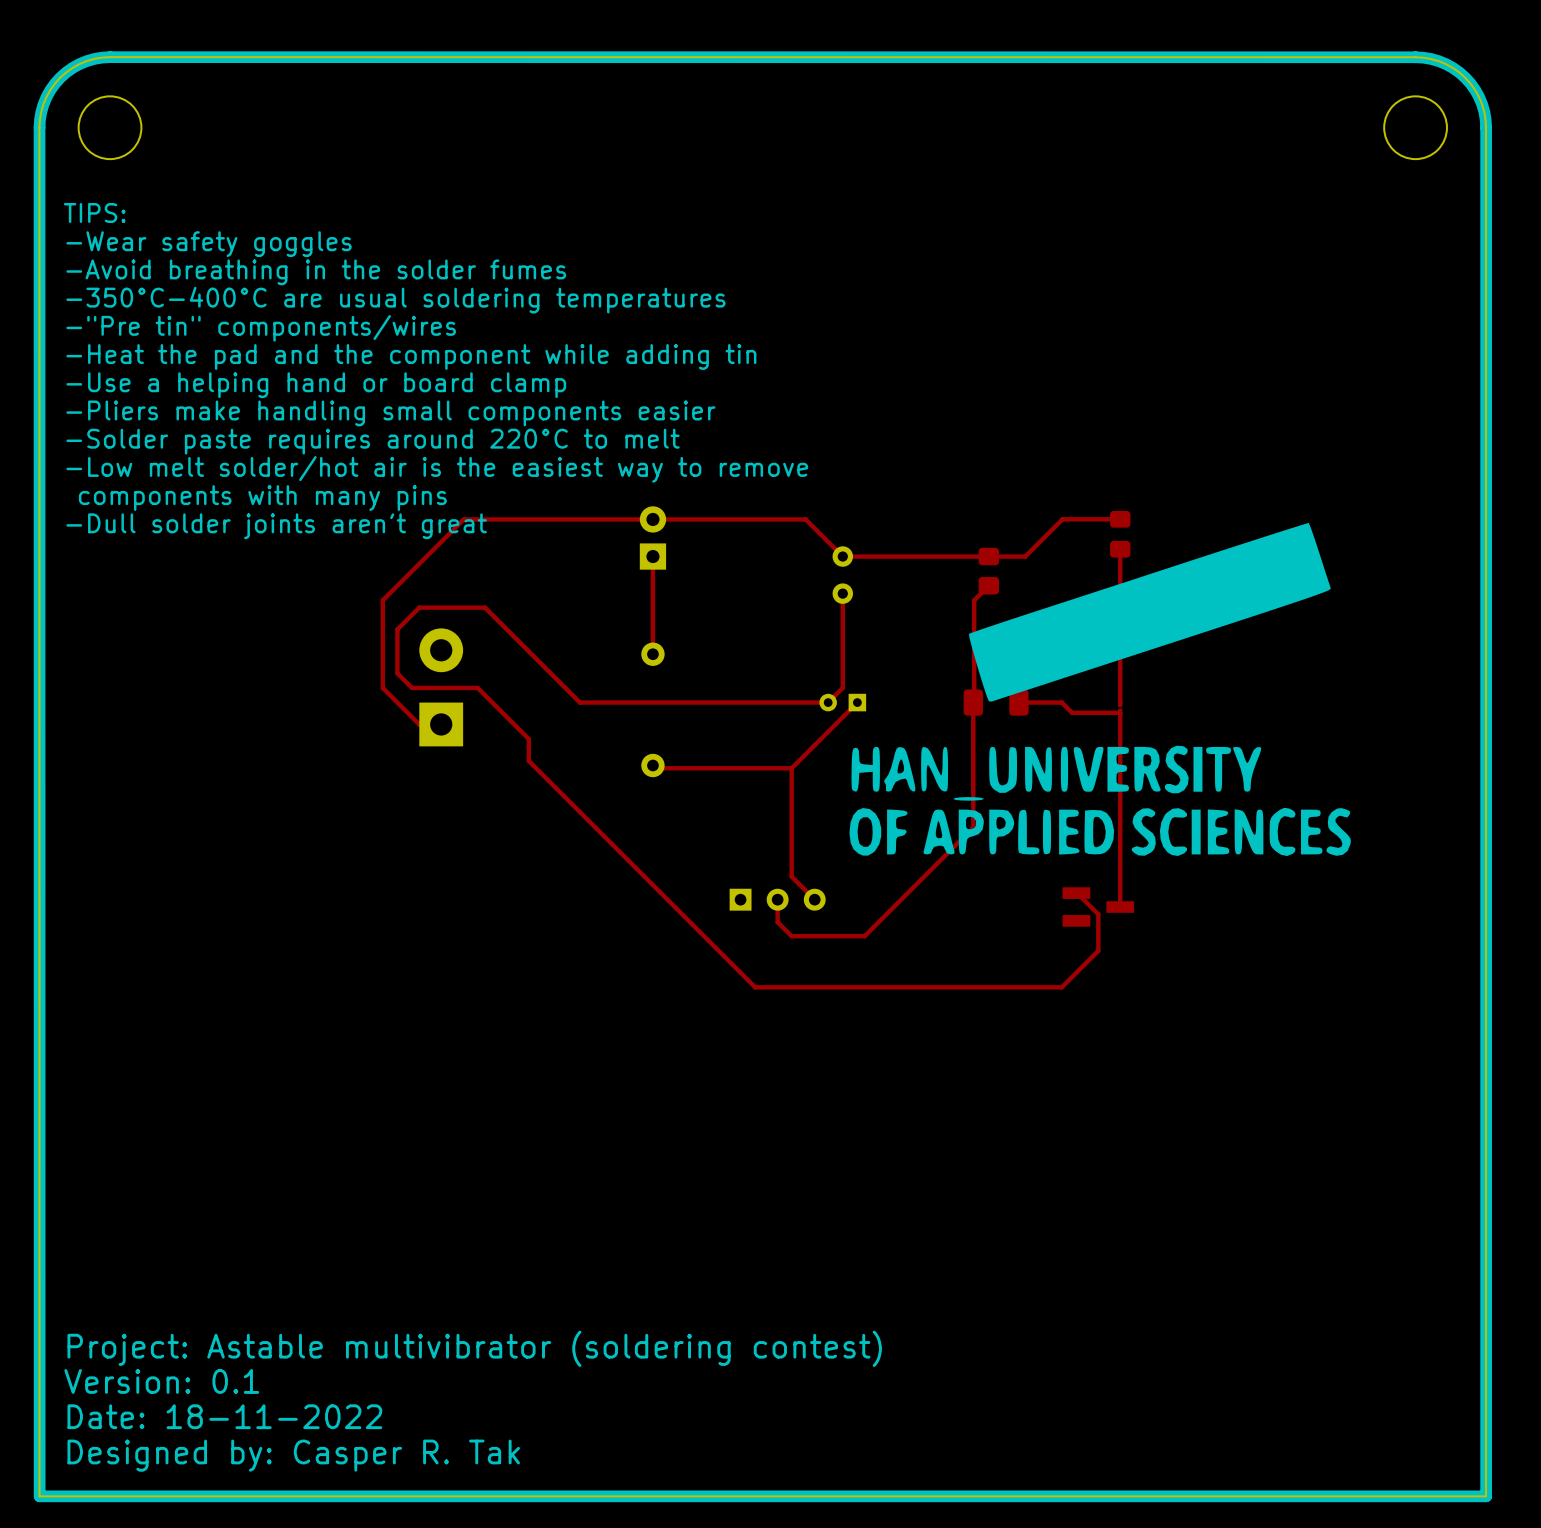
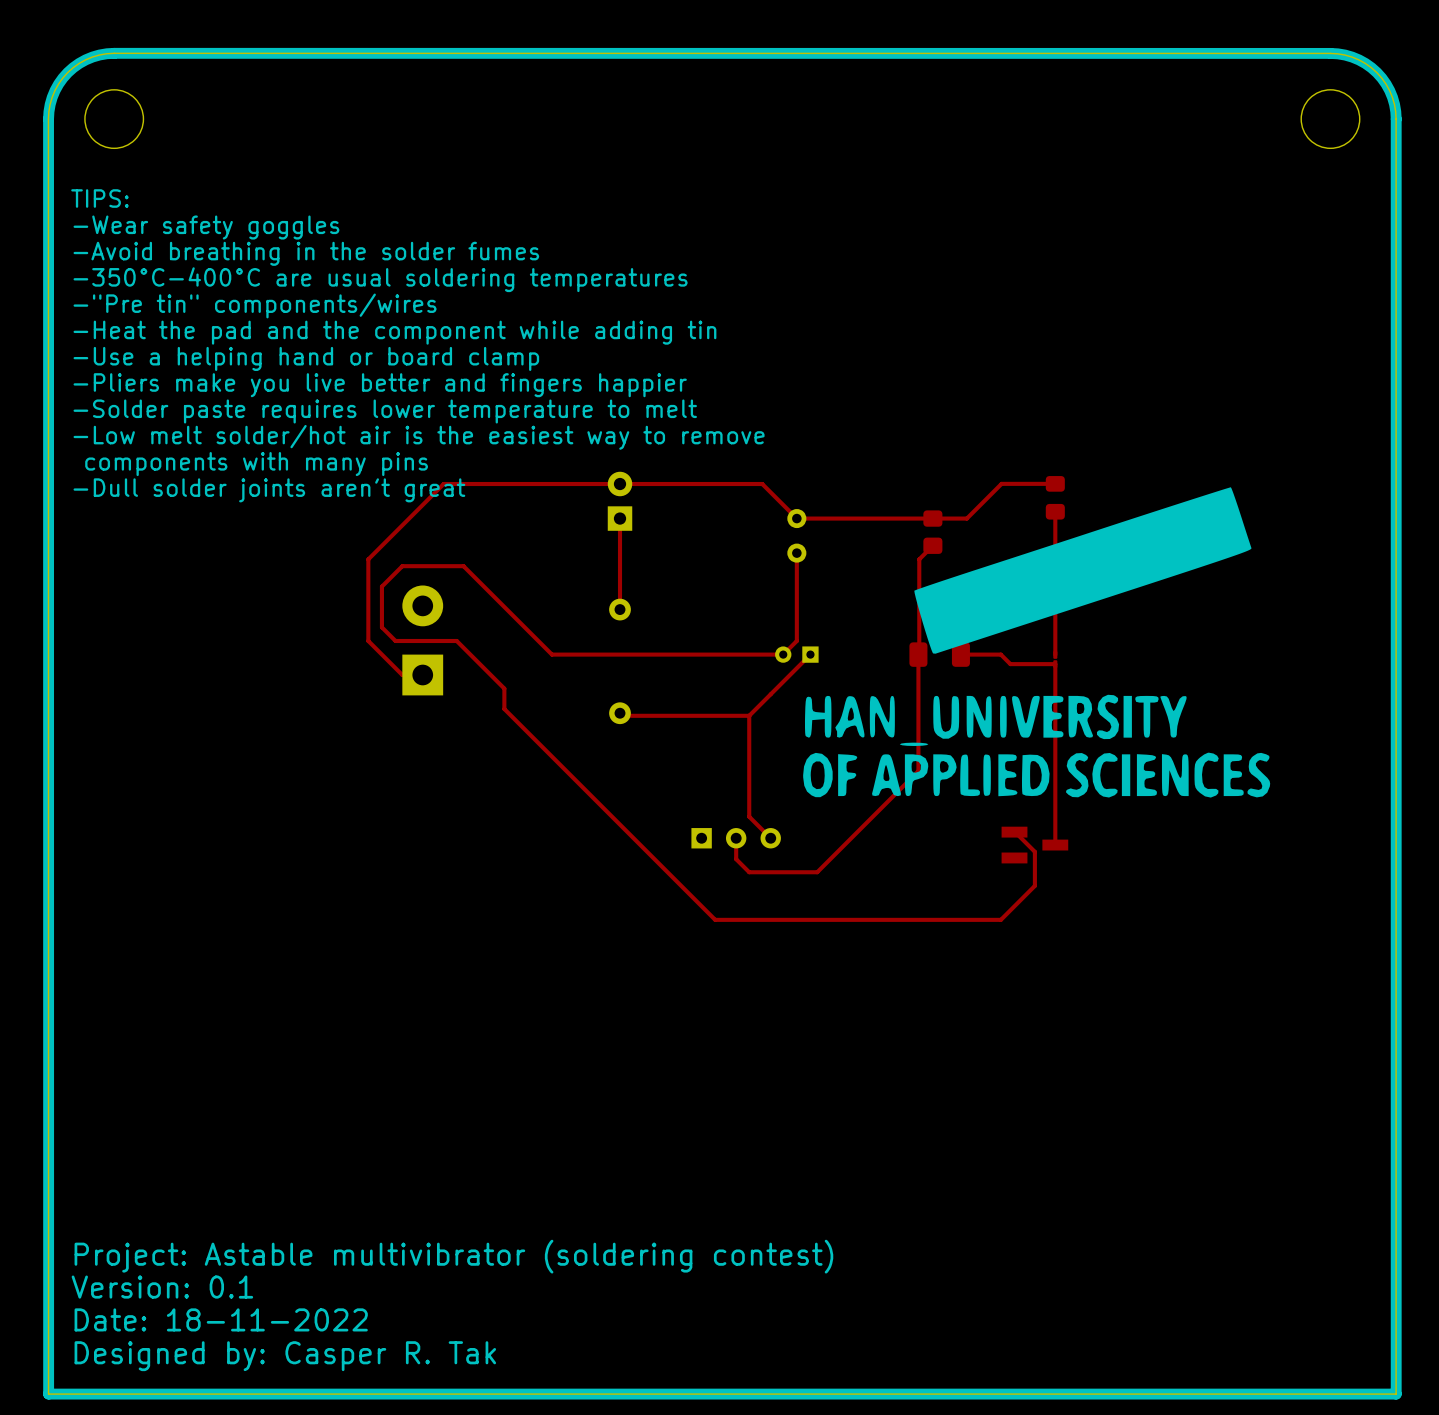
text: -Pliers make handling small components easier (390, 413) -> -Pliers make you live better and fingers happier (380, 385)
text: -Solder paste requires around 220°C to melt (373, 441) -> -Solder paste requires lower temperature to melt (385, 411)

